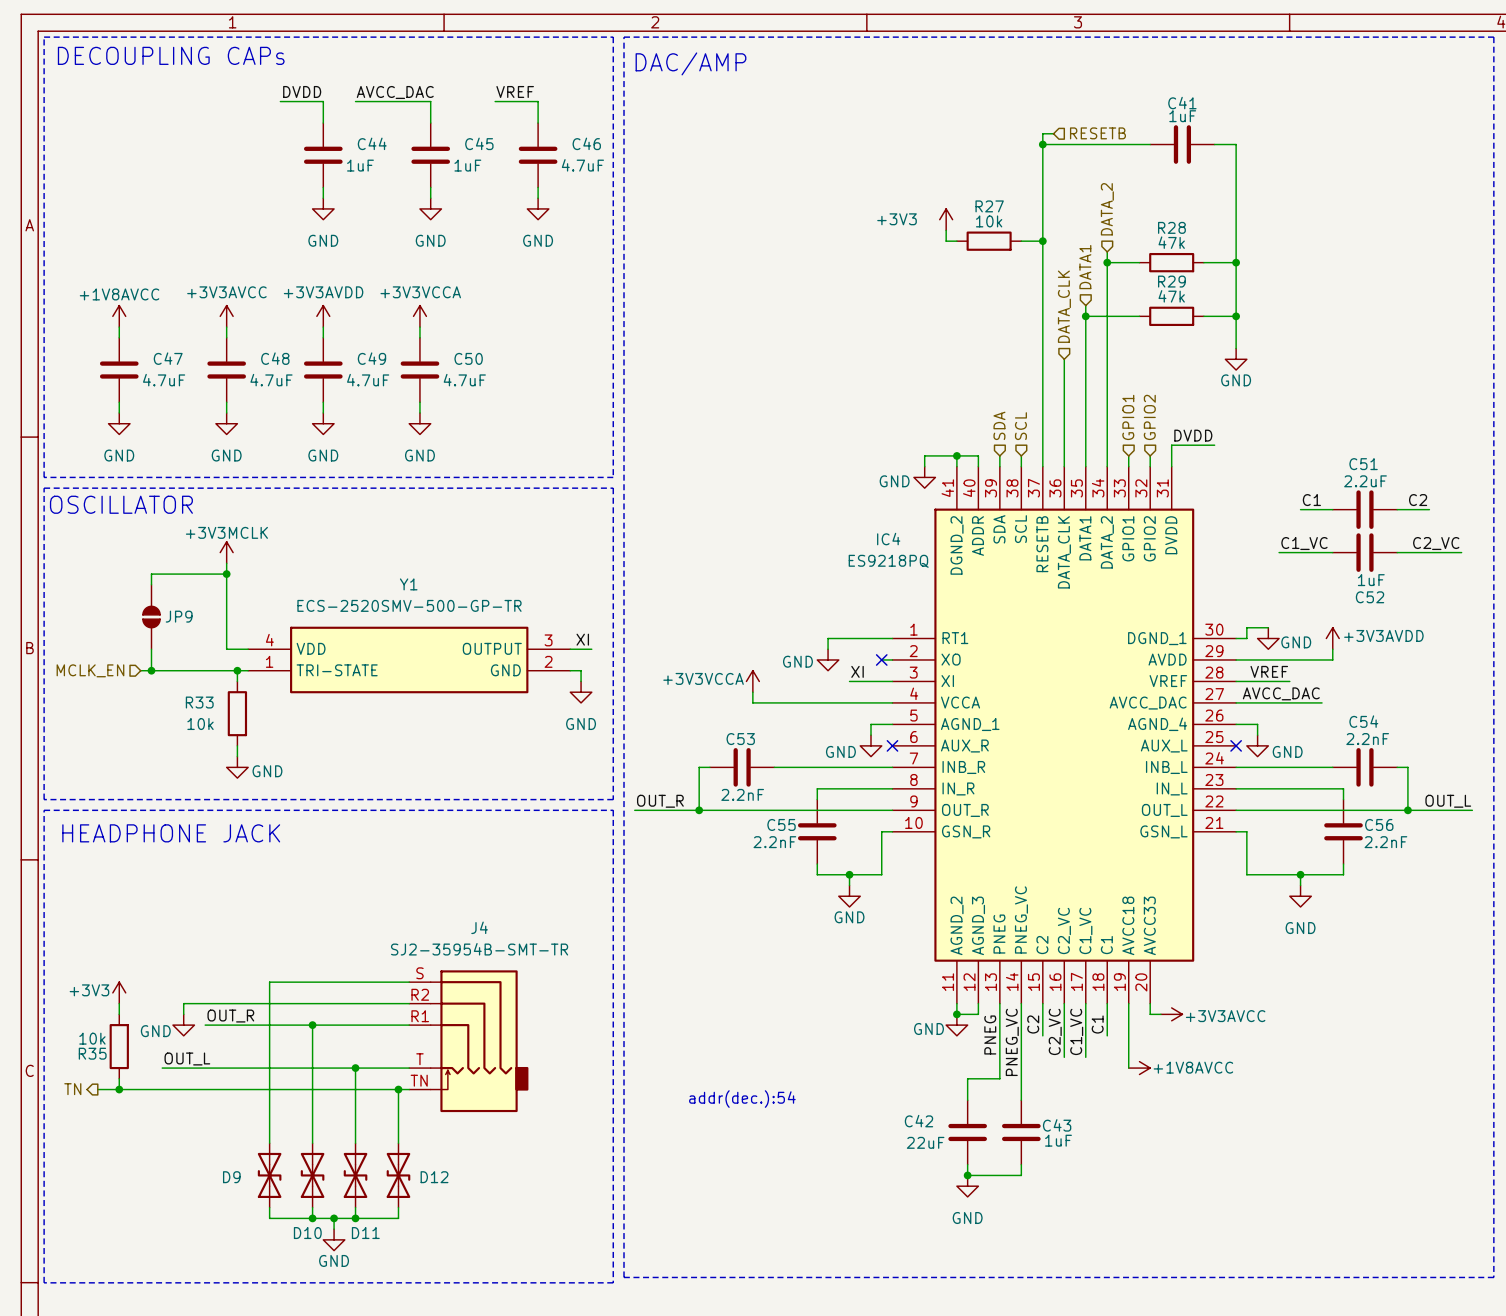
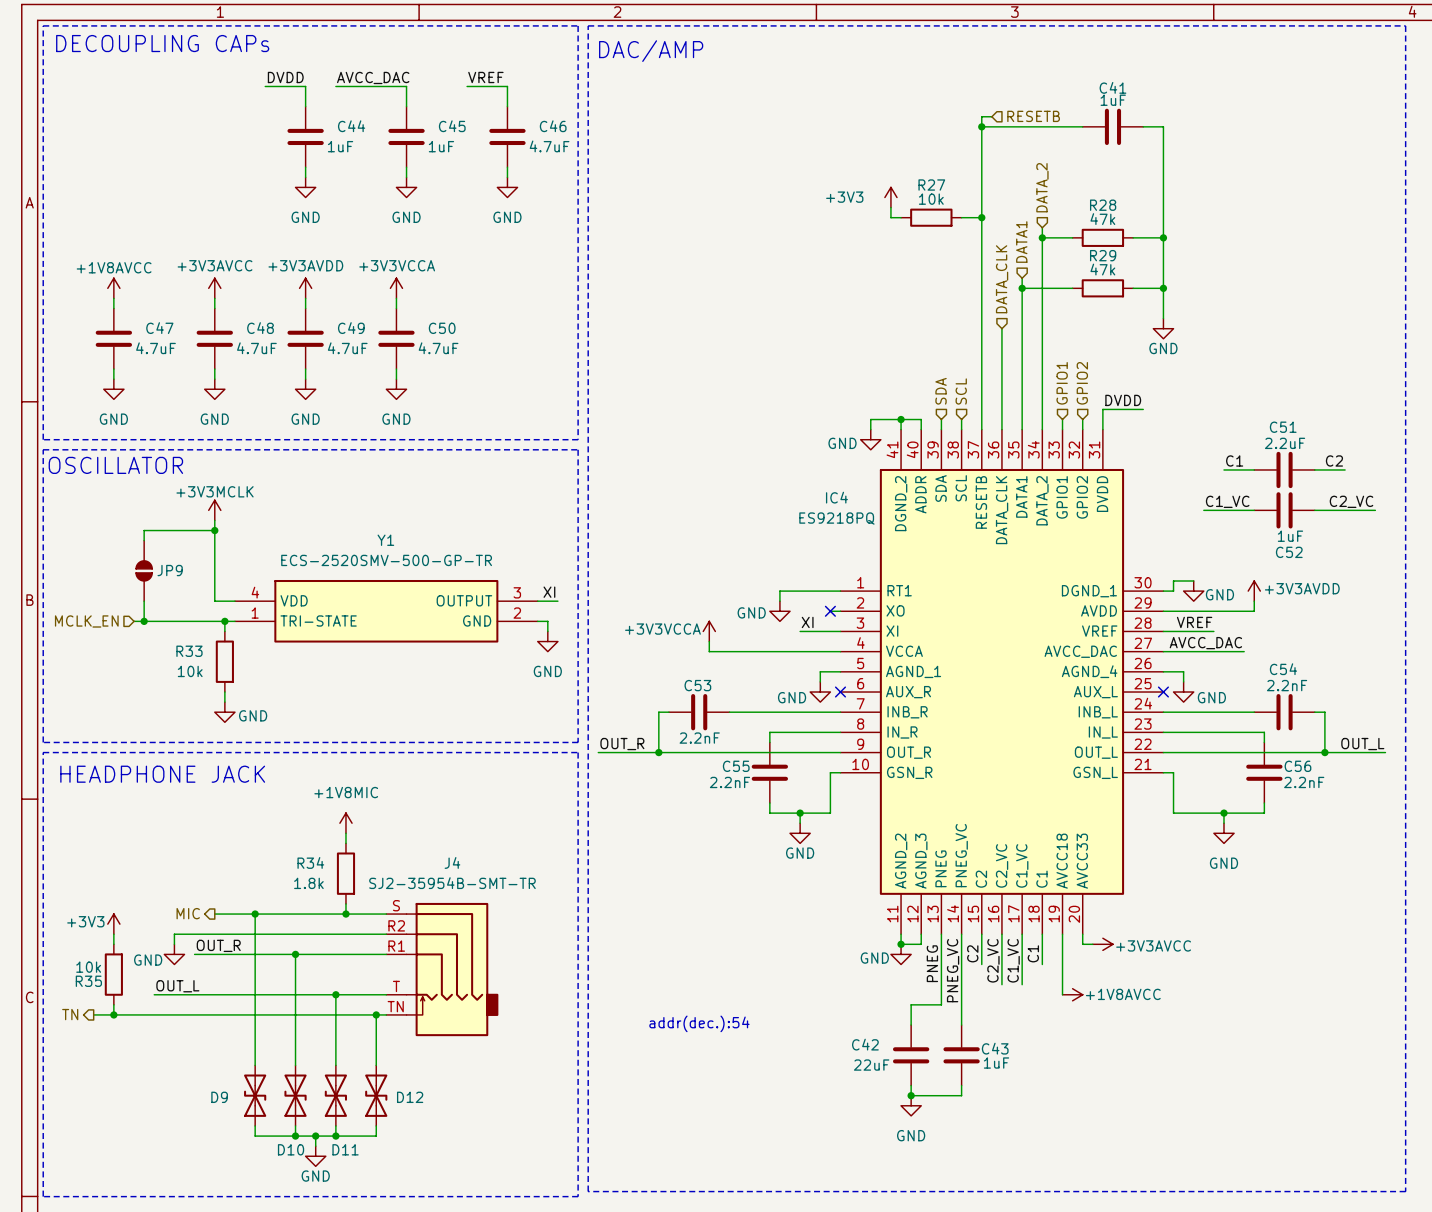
power symbol: none -> +1V8MIC (345, 823)
wire: none -> (345, 833) (345, 843)
R34: none -> 1.8k (345, 873)
wire: none -> (345, 903) (345, 914)
hierarchical label: none -> MIC (188, 913)
wire: none -> (214, 914) (255, 914)
junction: none -> (255, 914)
junction: none -> (345, 914)

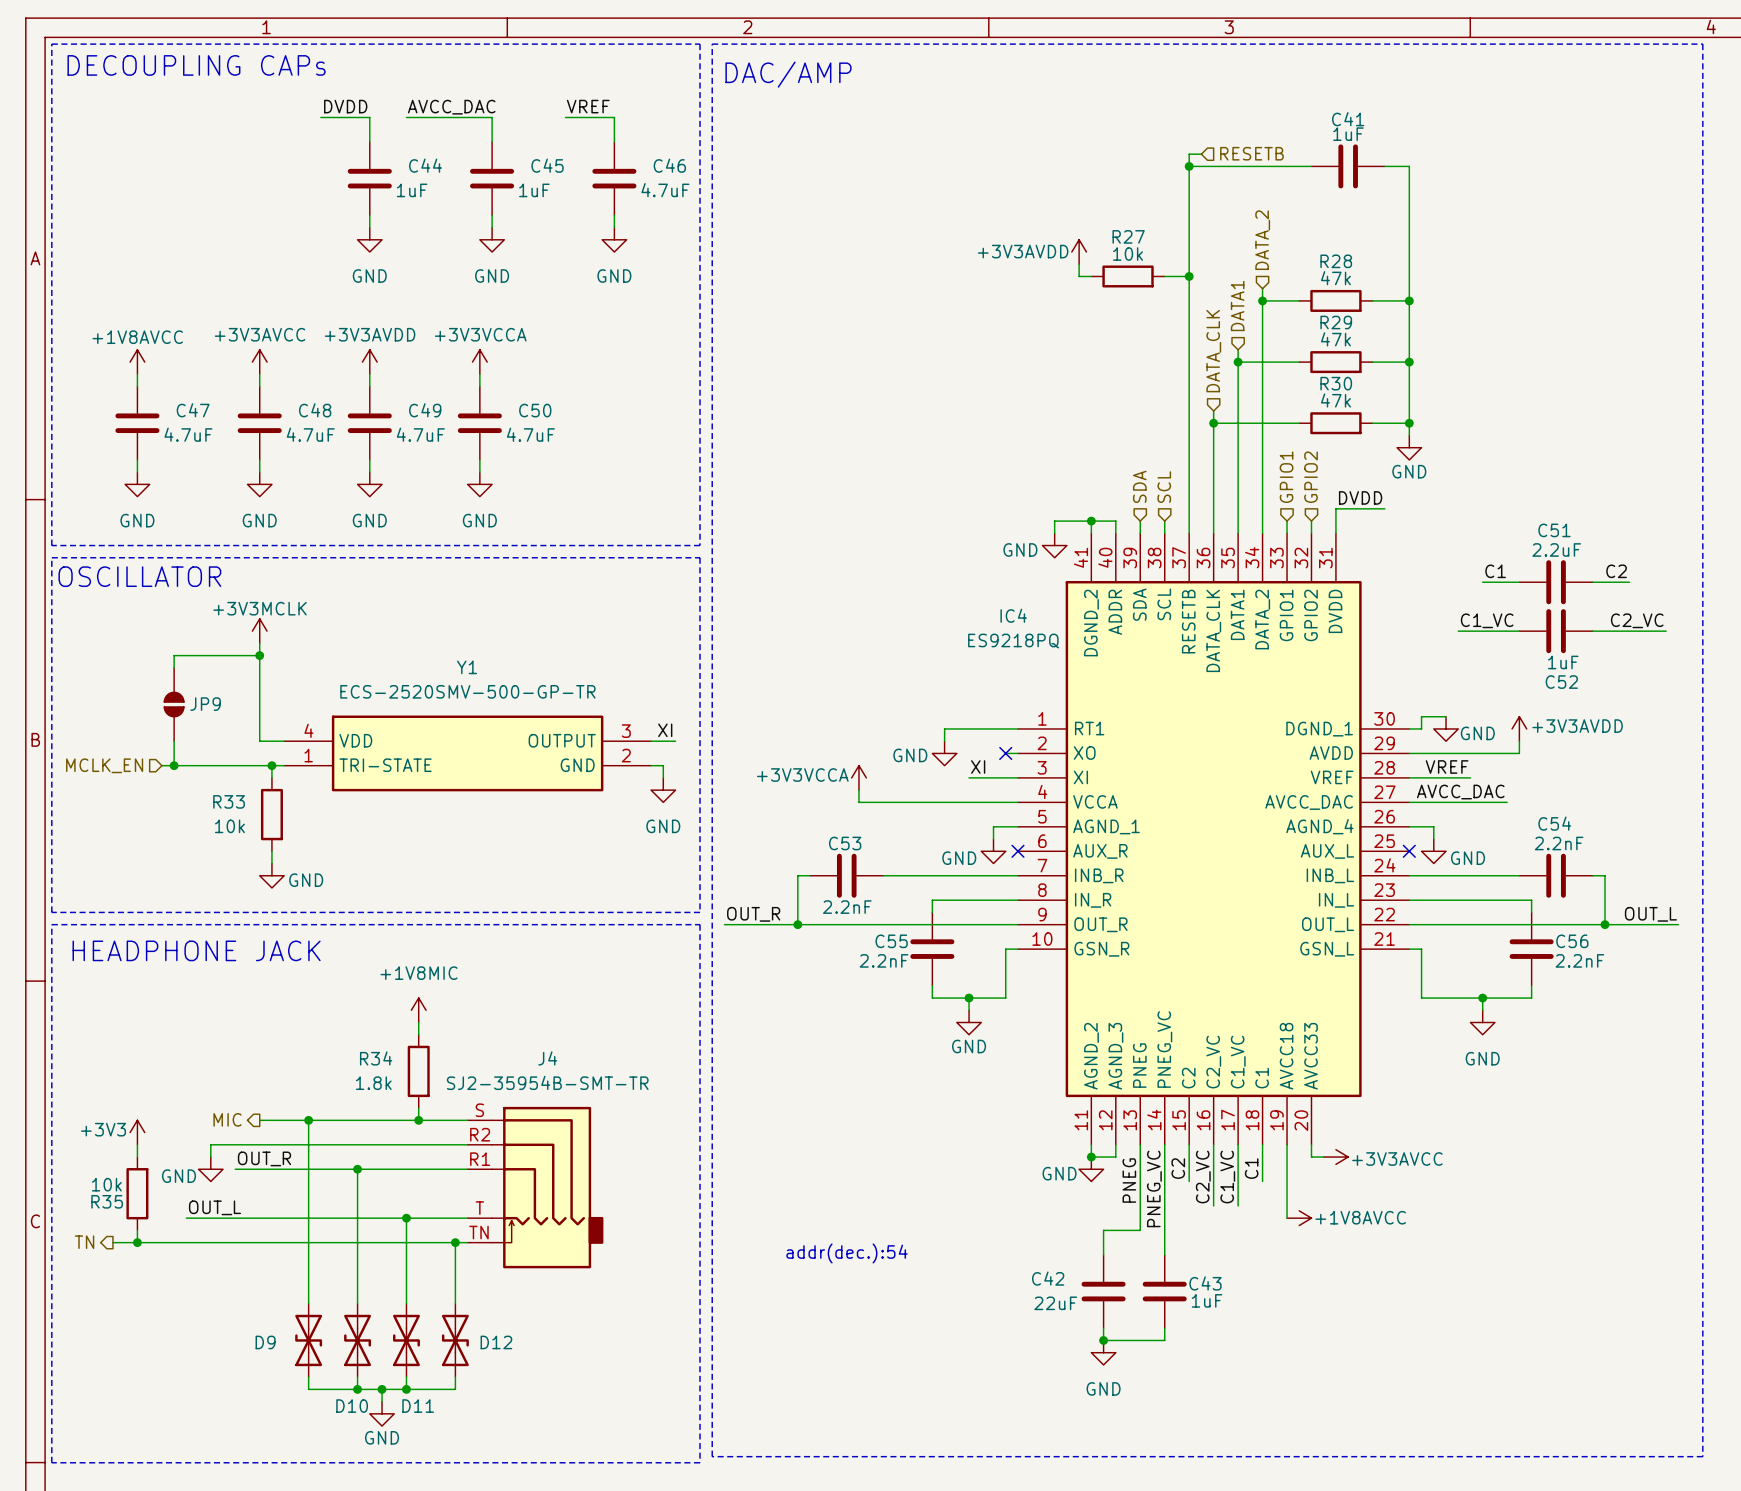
power symbol: +3V3 (890, 197) -> +3V3AVDD (1079, 252)
wire: none -> (1409, 398) (1409, 435)
power symbol position: GND (1163, 328) -> GND (1409, 447)
wire: none -> (1213, 423) (1299, 423)
junction: none -> (1213, 423)
R30: none -> 47k (1335, 423)
wire: none -> (1372, 423) (1409, 423)
junction: none -> (1409, 423)

